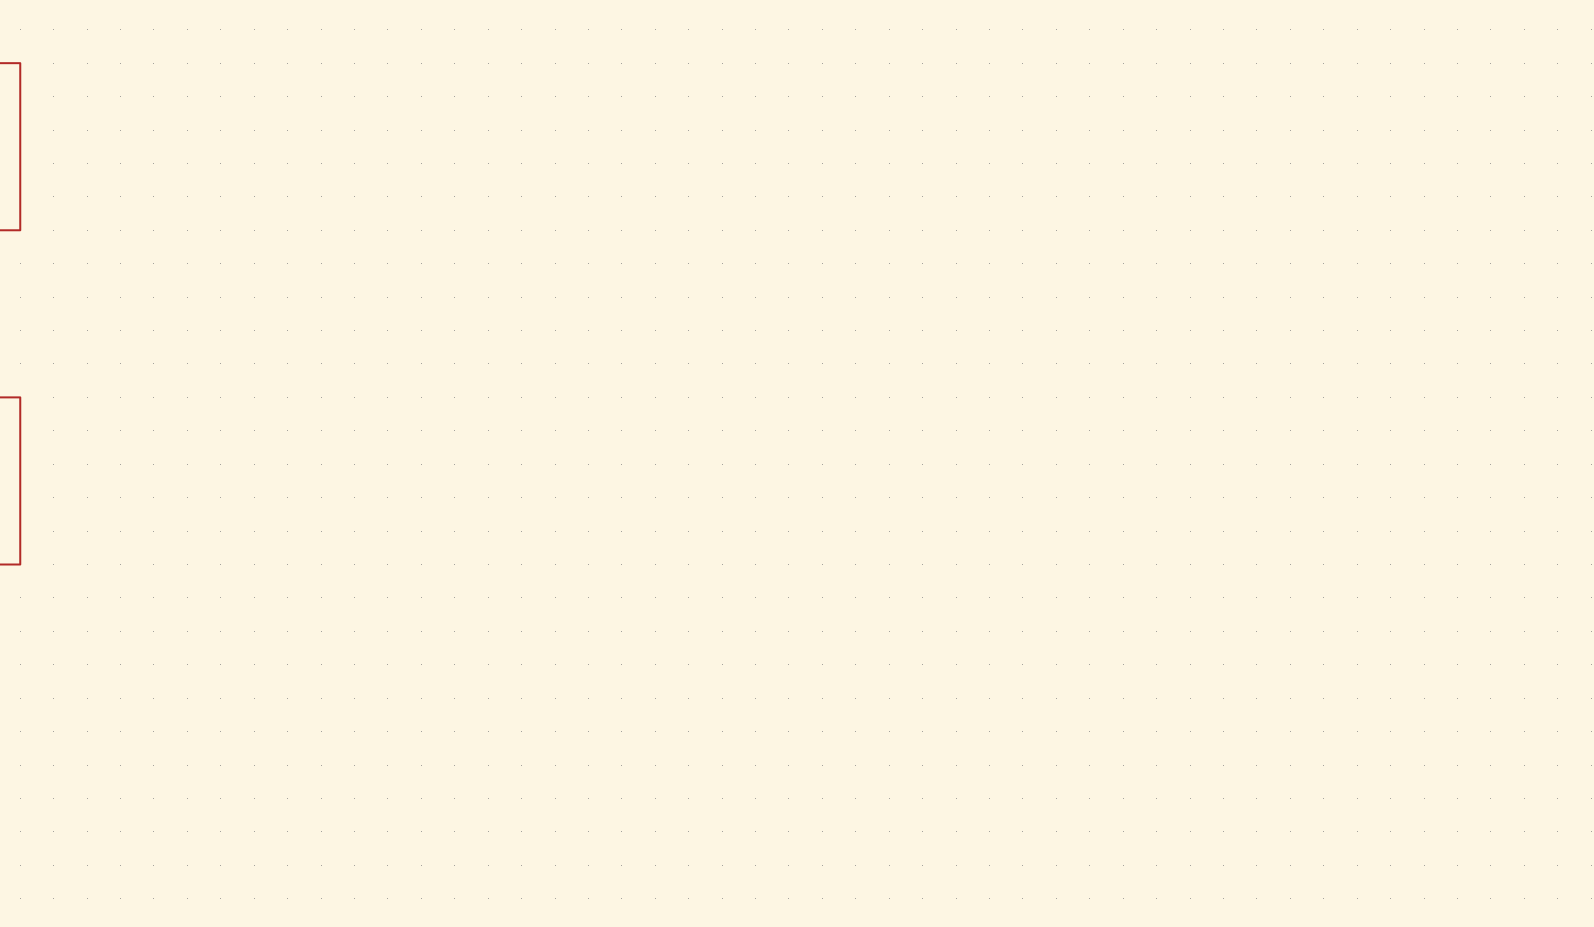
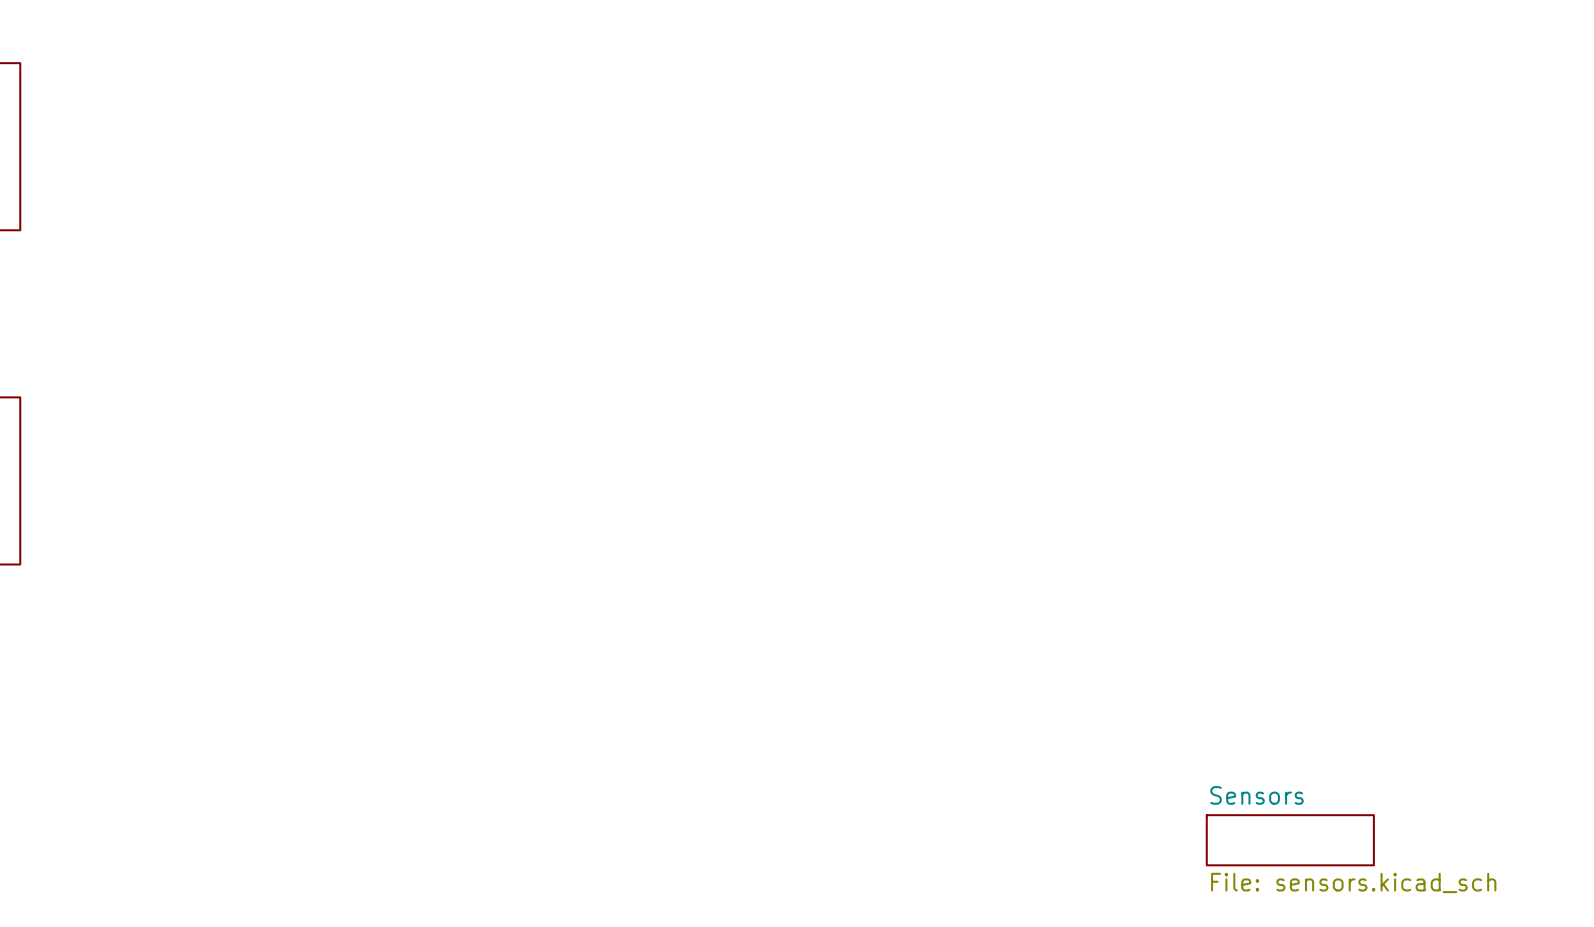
sheet Sensors: none -> File: sensors.kicad_sch (1290, 840)

